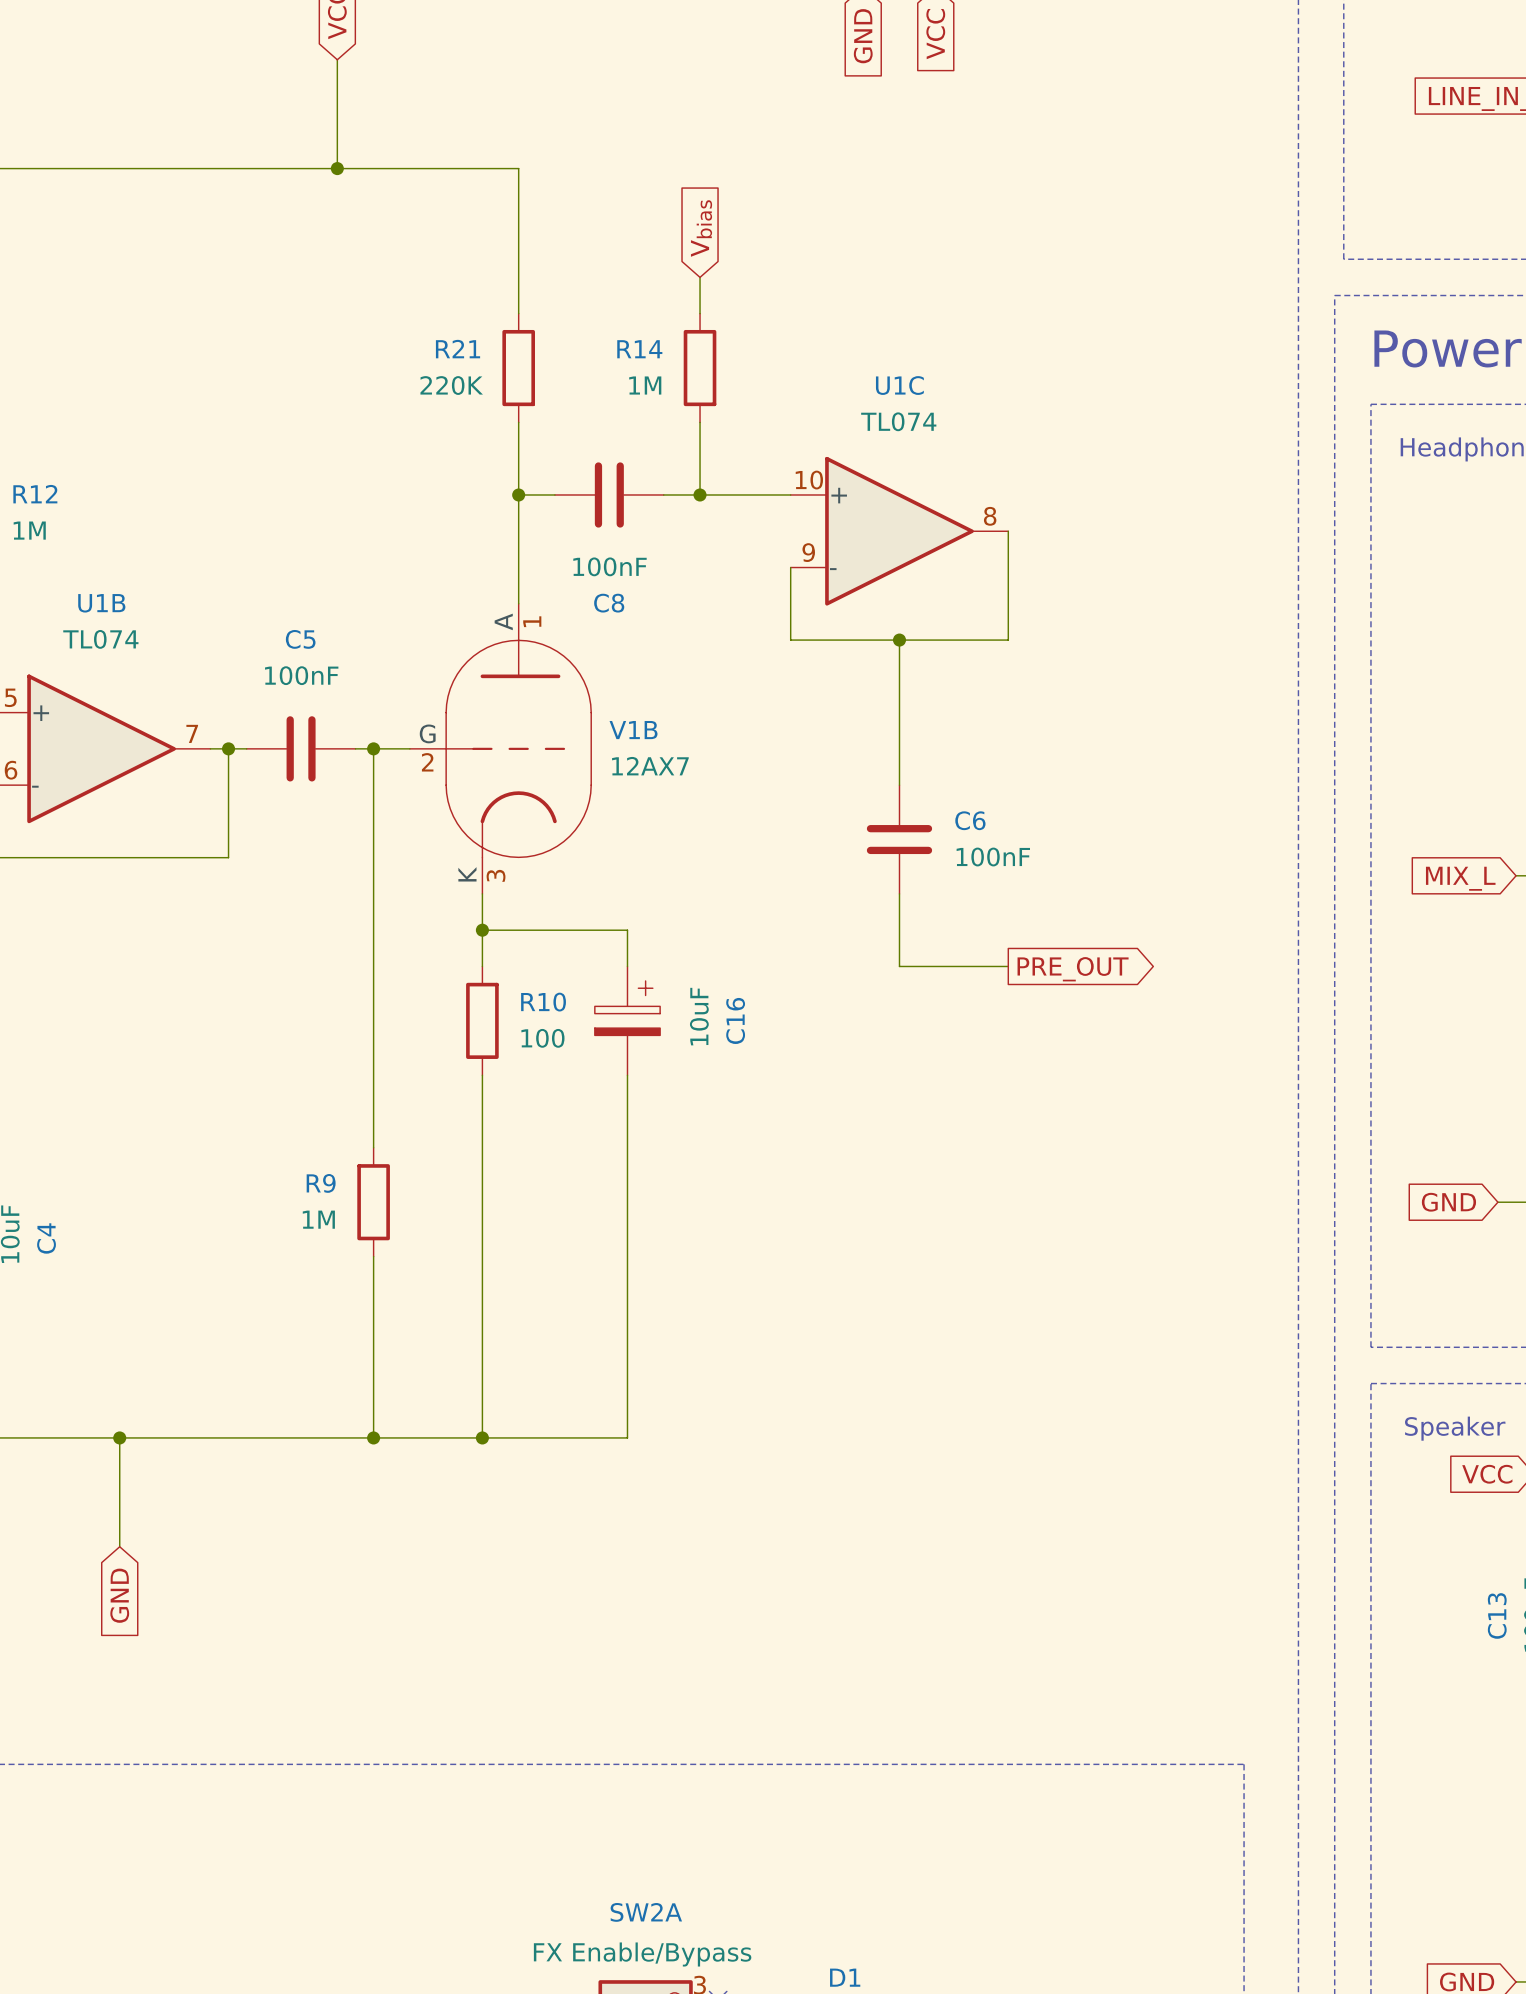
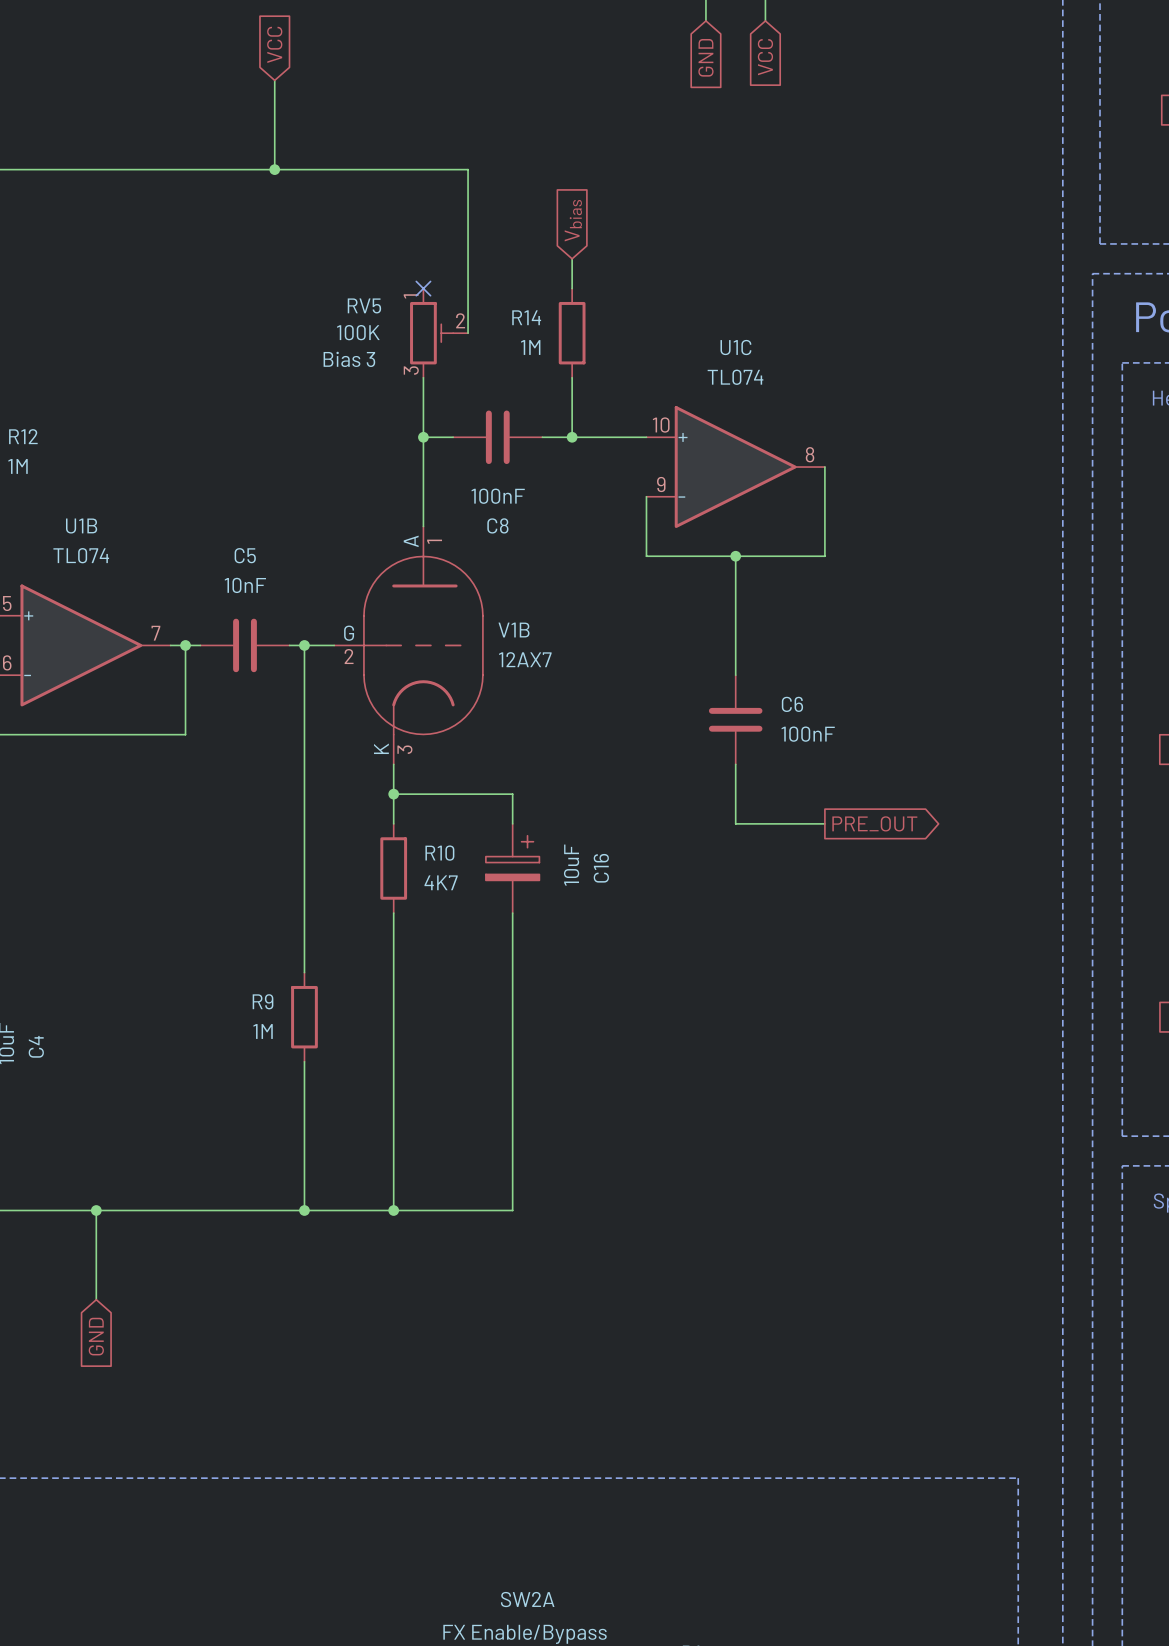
wire: (518, 168) (518, 313) -> (423, 169) (468, 169) (468, 333)
no-connect mark: none -> (423, 288)
R21: 220K (518, 368) -> none
RV5: none -> 100K (439, 333)
C5 value: 100nF (301, 675) -> 10nF (245, 585)
R10 value: 100 (542, 1038) -> 4K7 (441, 882)

